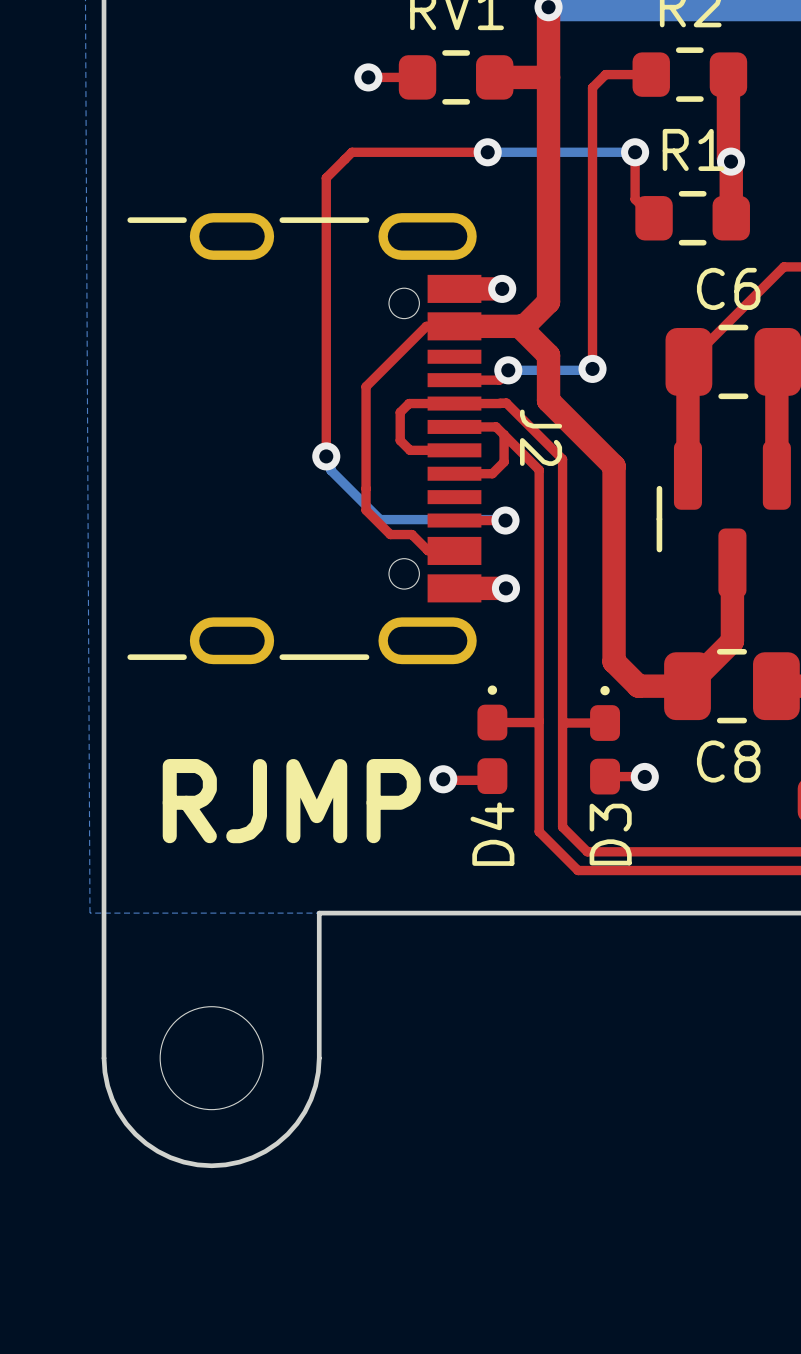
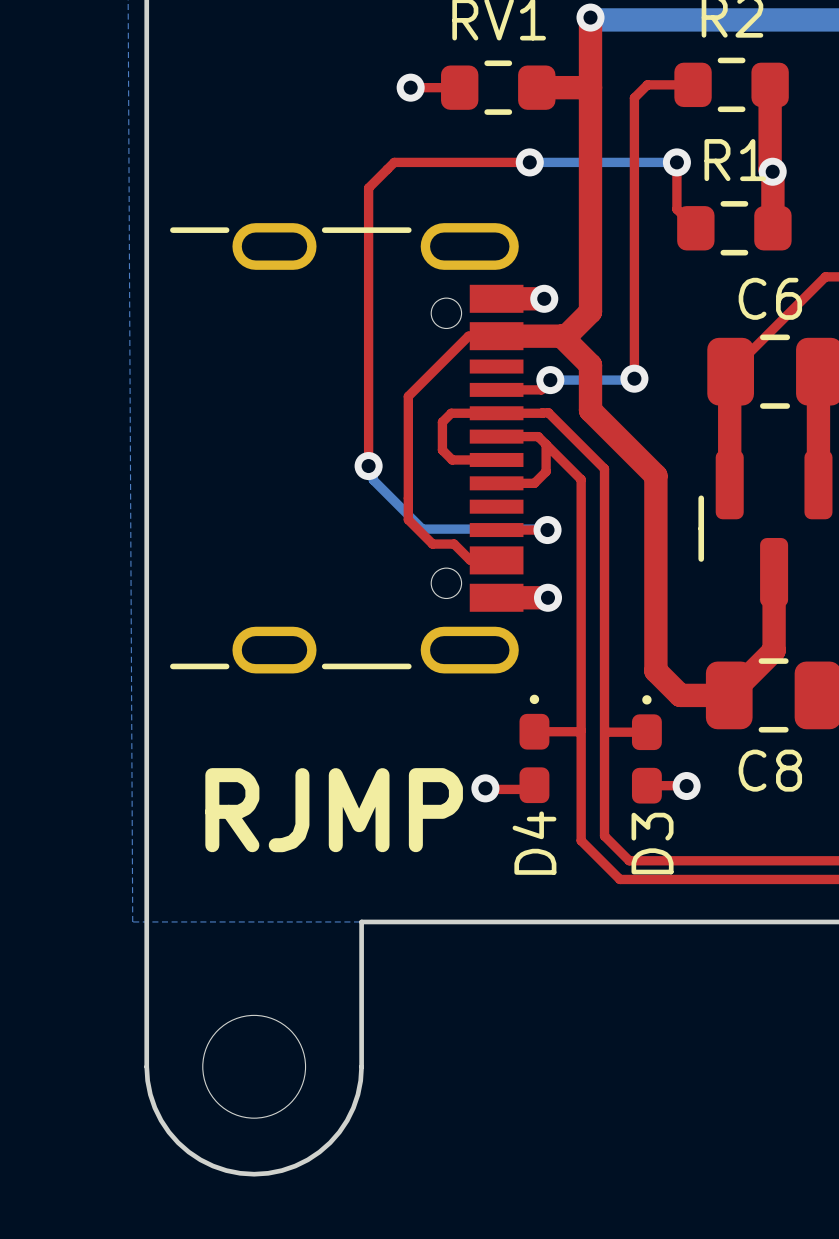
J2 name: J2 (541, 437) -> none

